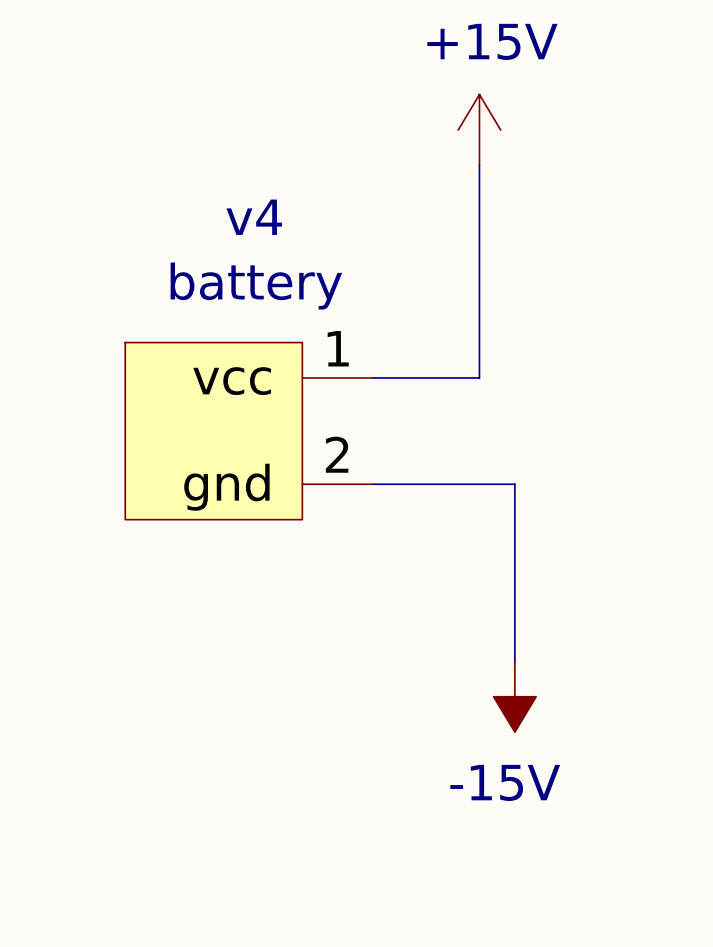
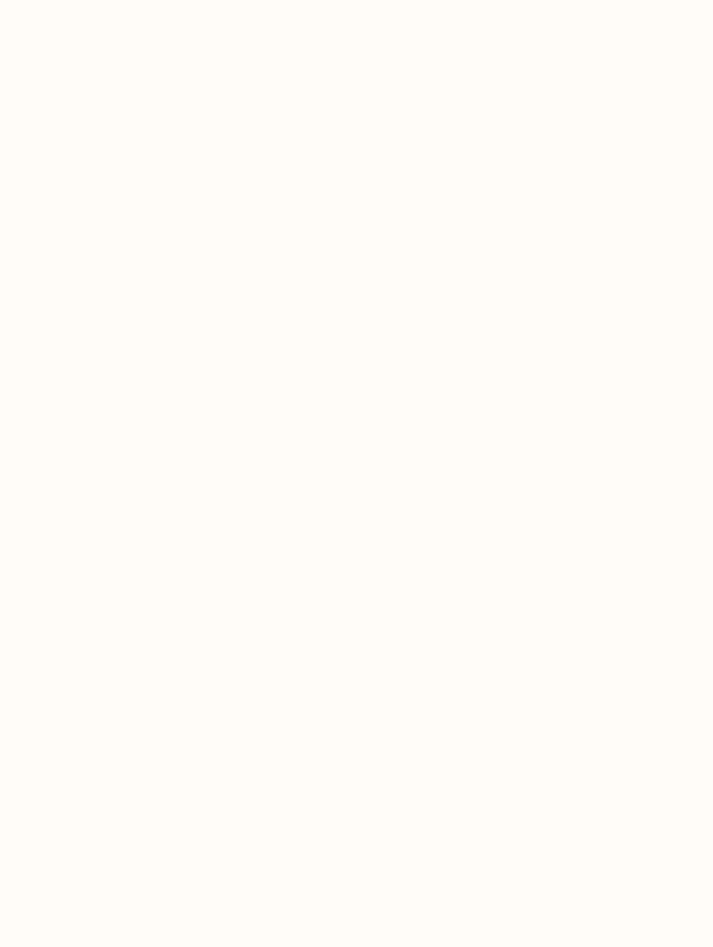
power symbol: +15V (479, 130) -> none
wire: (479, 165) (479, 377) (373, 377) -> none
v4: battery (249, 431) -> none
wire: (373, 484) (514, 484) (514, 661) -> none
power symbol: -15V (514, 696) -> none

